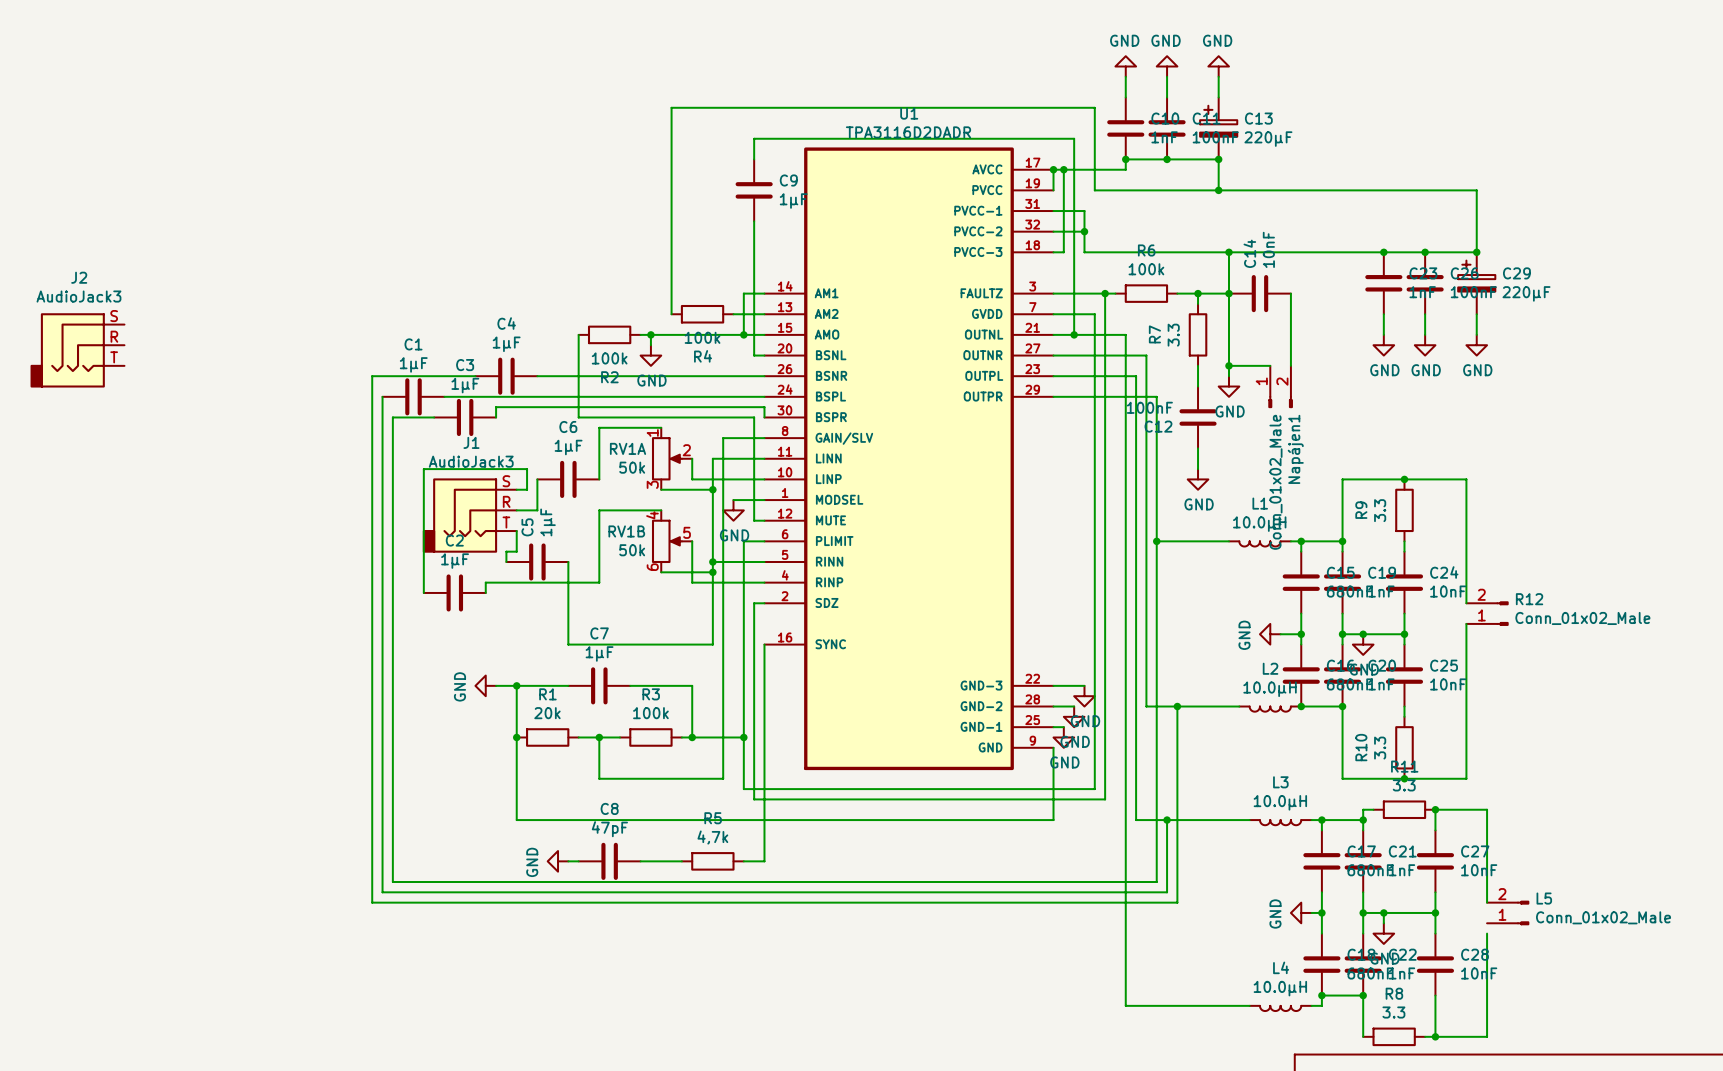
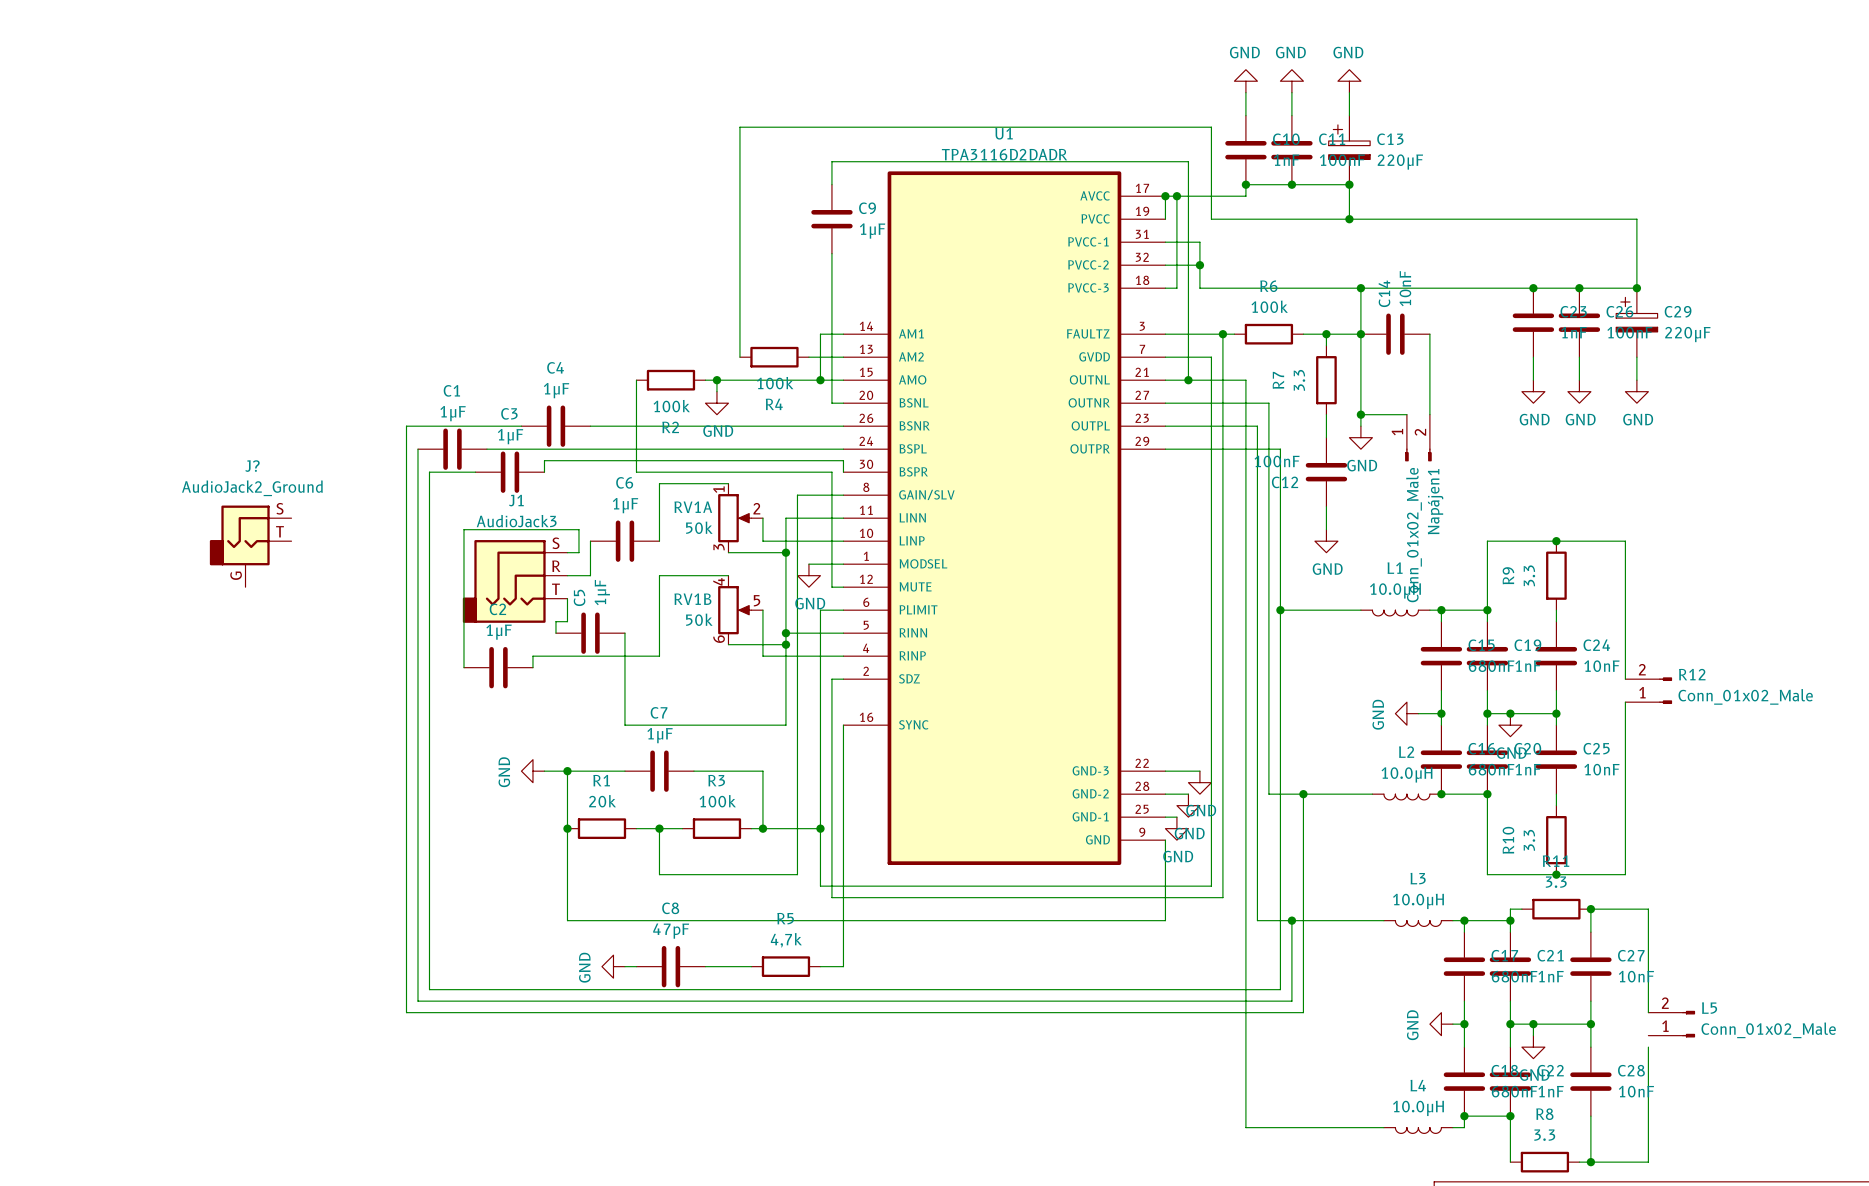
J2: AudioJack3 (77, 350) -> none
J?: none -> AudioJack2_Ground (250, 546)

